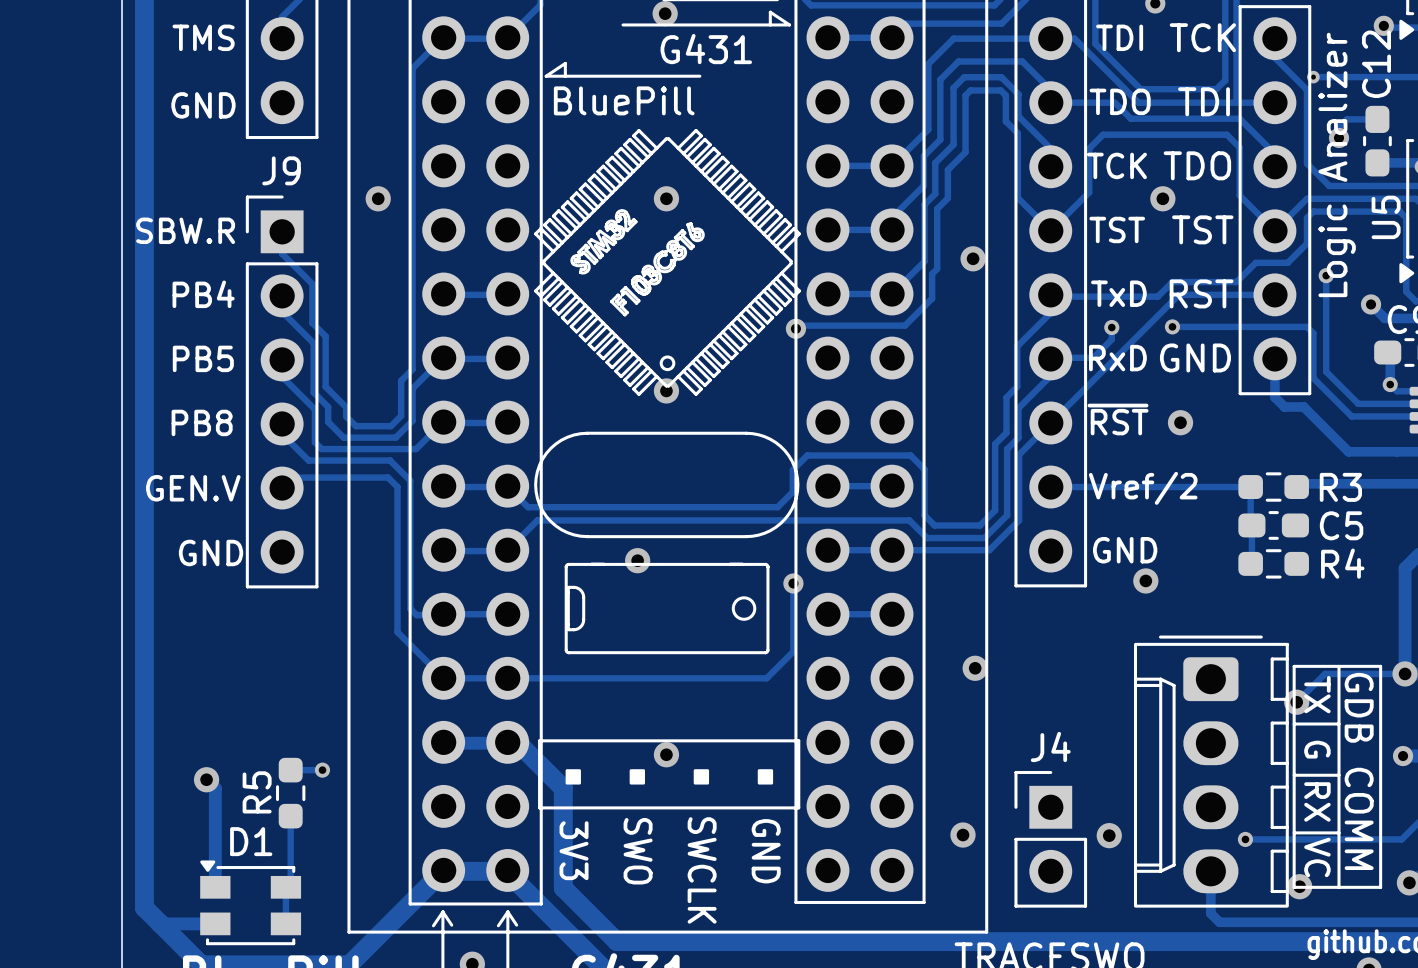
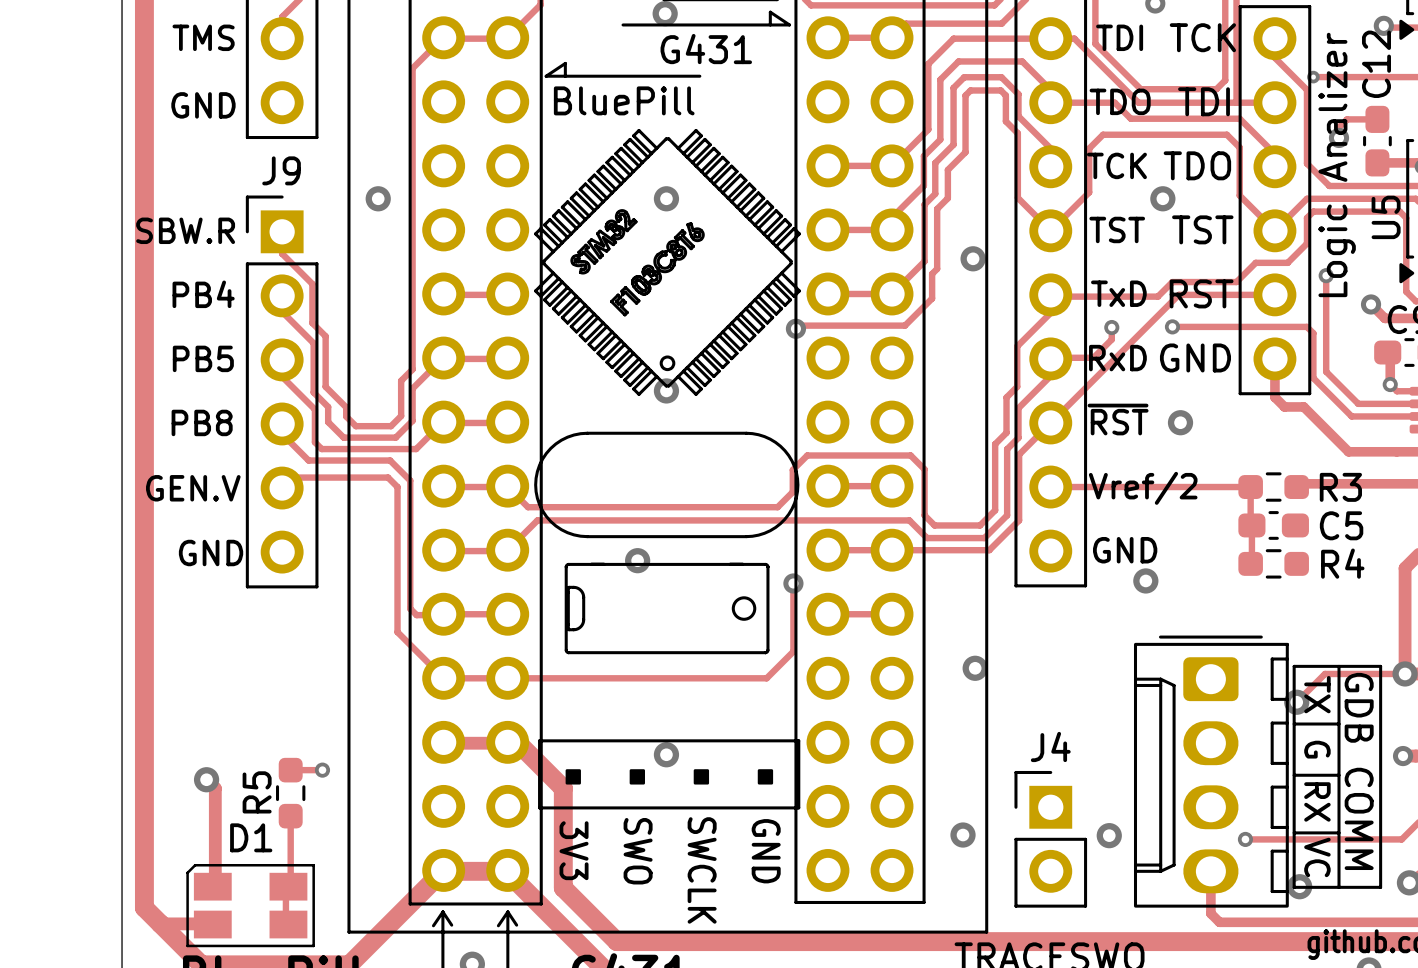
D1 footprint: [200, 860, 302, 946] -> [186, 863, 315, 948]

